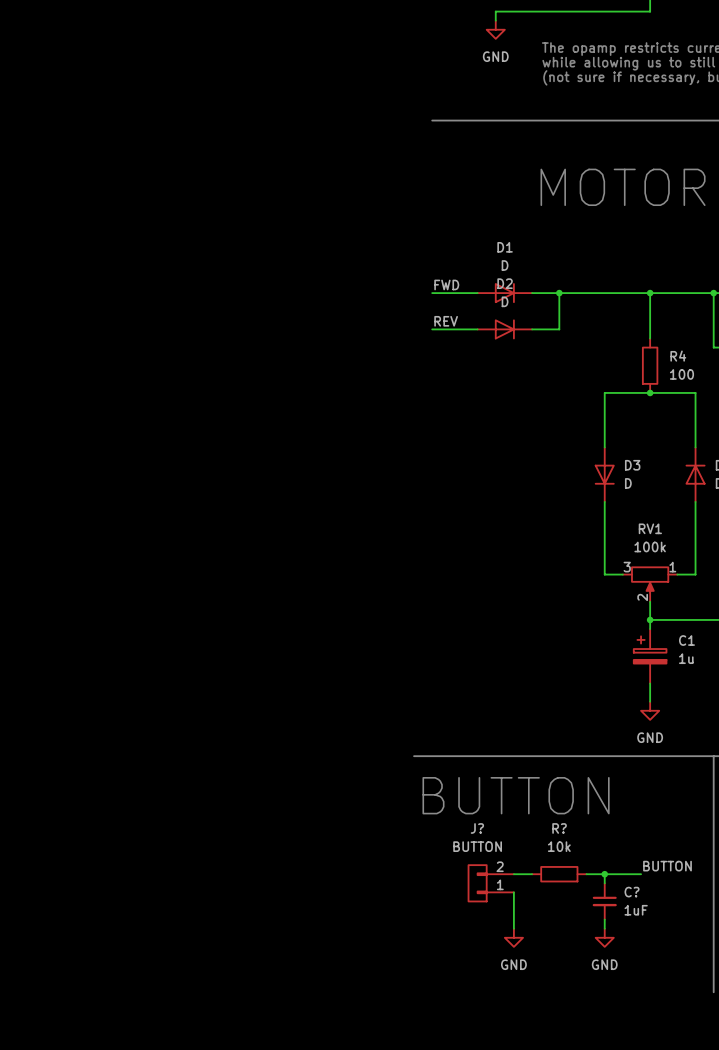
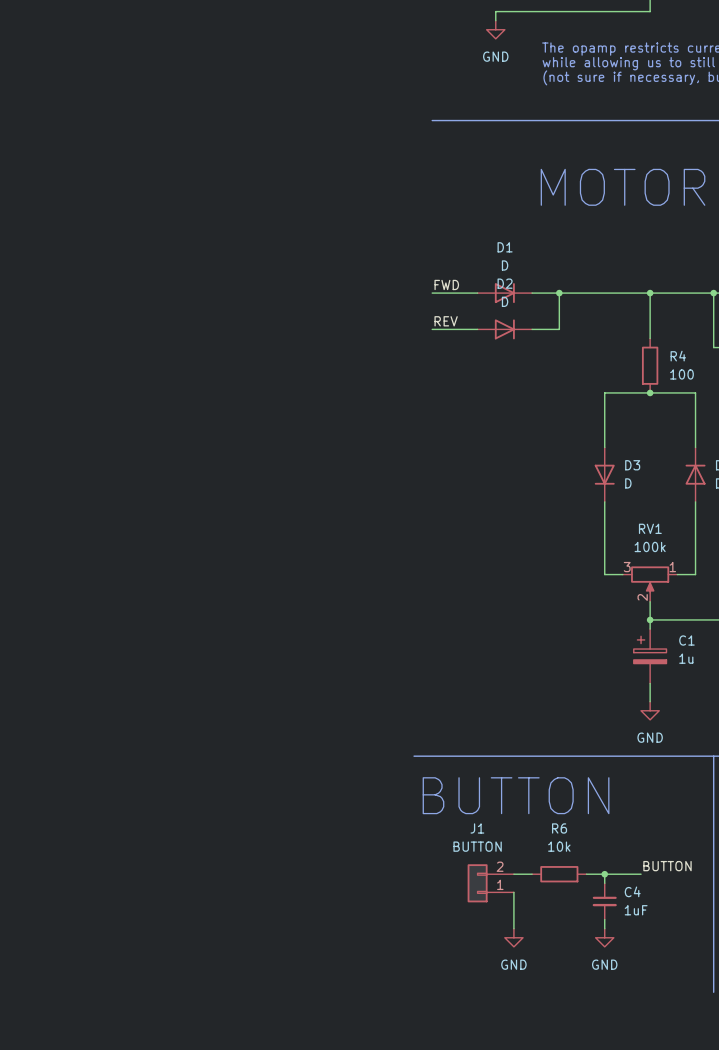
J? name: J? (477, 828) -> J1 (477, 828)
R? name: R? (559, 828) -> R6 (559, 828)
C? name: C? (632, 892) -> C4 (632, 891)

